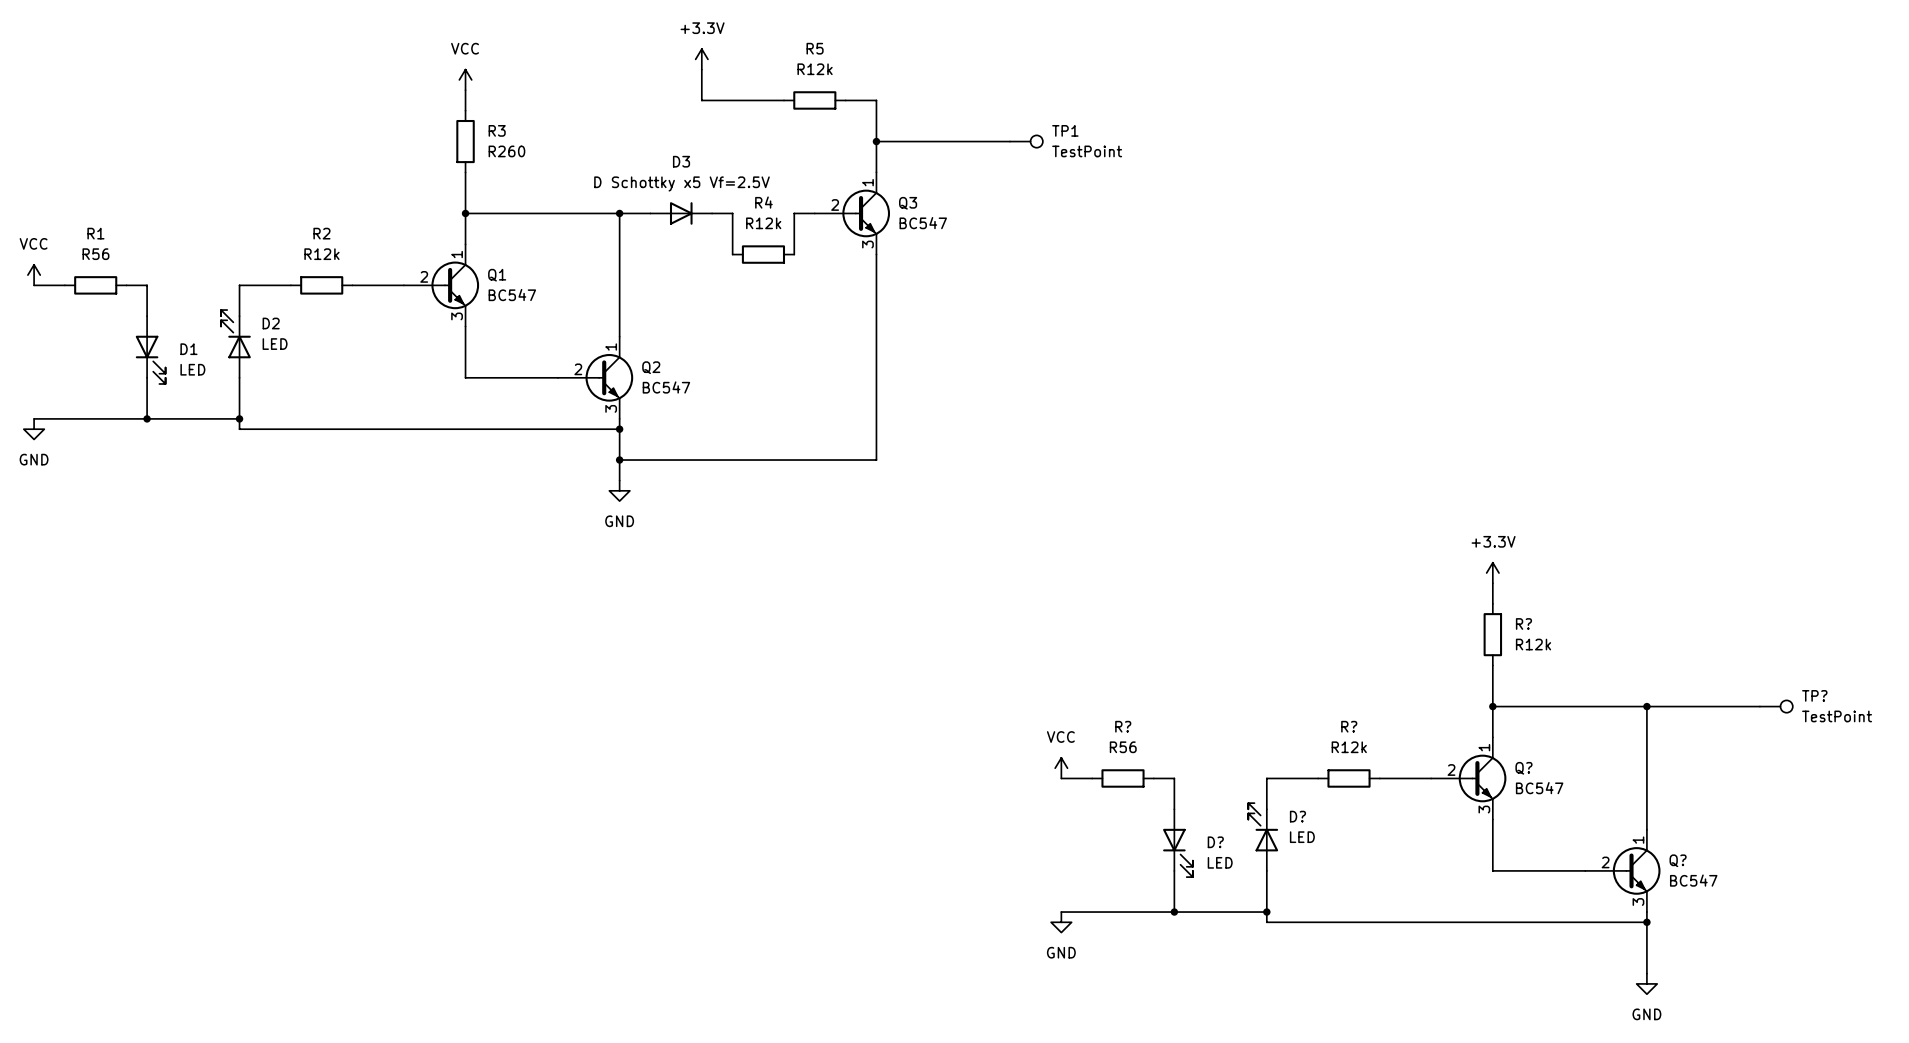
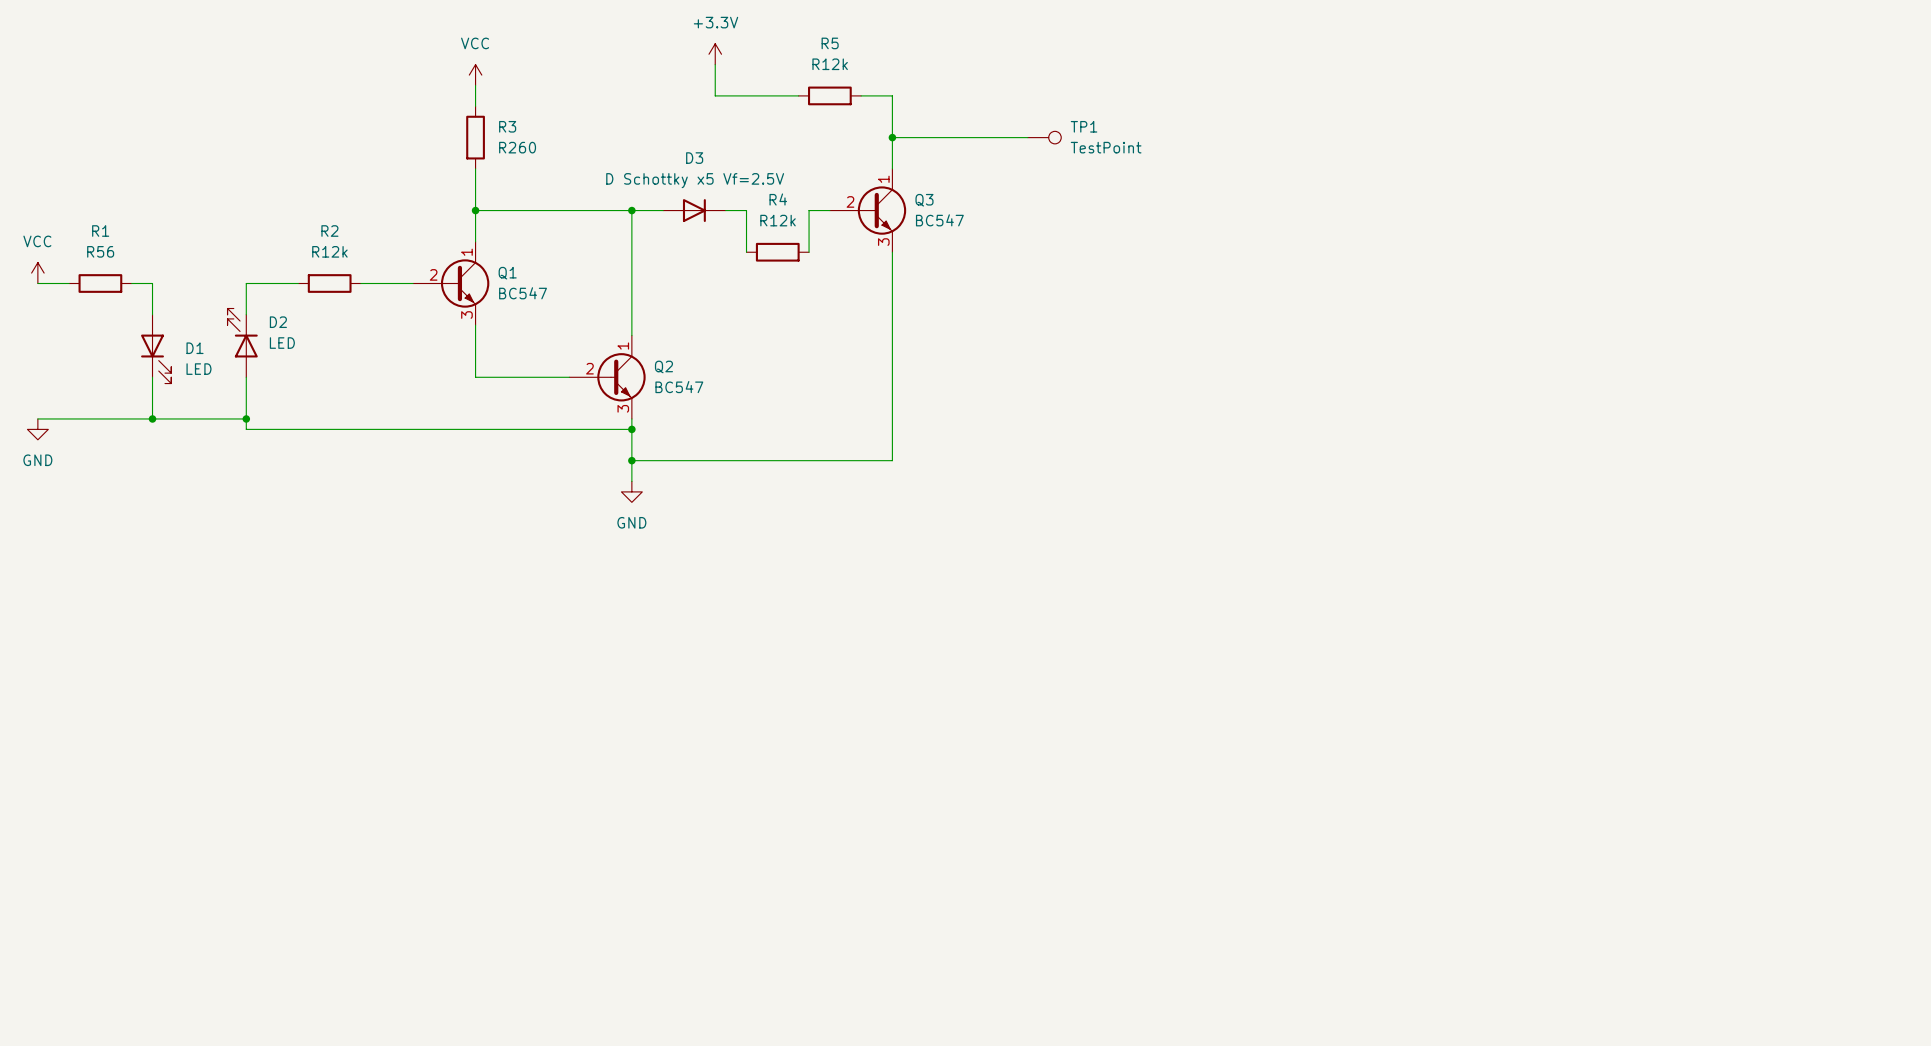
power symbol: +3.3V (1492, 573) -> none
wire: (1492, 583) (1492, 603) -> none
R?: R12k (1492, 634) -> none
wire: (1492, 665) (1492, 737) -> none
wire: (1492, 706) (1759, 706) -> none
junction: (1492, 706) -> none
wire: (1646, 706) (1646, 829) -> none
junction: (1646, 706) -> none
TP?: TestPoint (1776, 706) -> none
power symbol: VCC (1061, 768) -> none
wire: (1061, 778) (1092, 778) -> none
R?: R56 (1123, 778) -> none
wire: (1153, 778) (1174, 778) (1174, 809) -> none
wire: (1318, 778) (1266, 778) (1266, 809) -> none
R?: R12k (1349, 778) -> none
wire: (1379, 778) (1431, 778) -> none
Q?: BC547 (1468, 778) -> none
wire: (1492, 819) (1492, 870) (1585, 870) -> none
D?: LED (1263, 837) -> none
D?: LED (1177, 843) -> none
wire: (1174, 870) (1174, 912) -> none
wire: (1266, 870) (1266, 922) (1646, 922) -> none
Q?: BC547 (1622, 870) -> none
wire: (1061, 912) (1266, 912) -> none
junction: (1174, 912) -> none
junction: (1266, 912) -> none
wire: (1646, 912) (1646, 973) -> none
power symbol: GND (1061, 922) -> none
junction: (1646, 922) -> none
power symbol: GND (1646, 983) -> none

